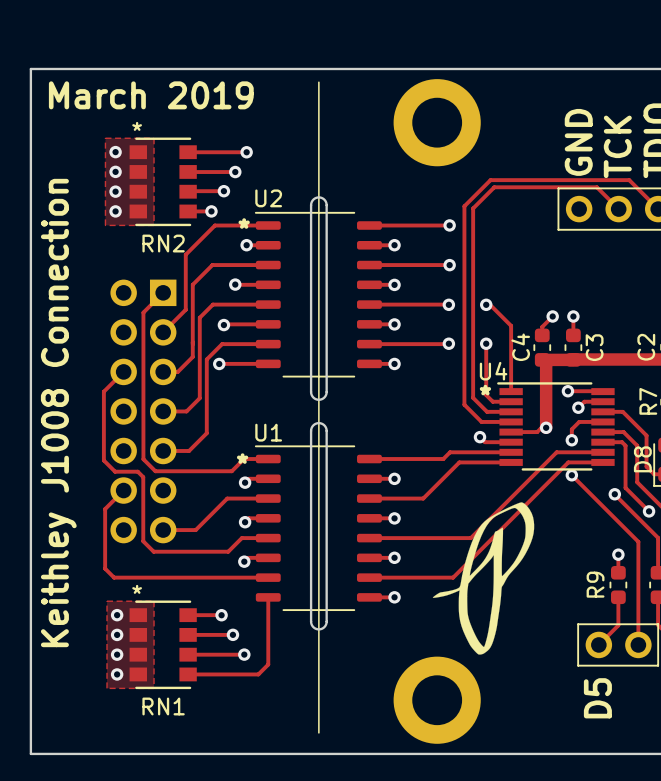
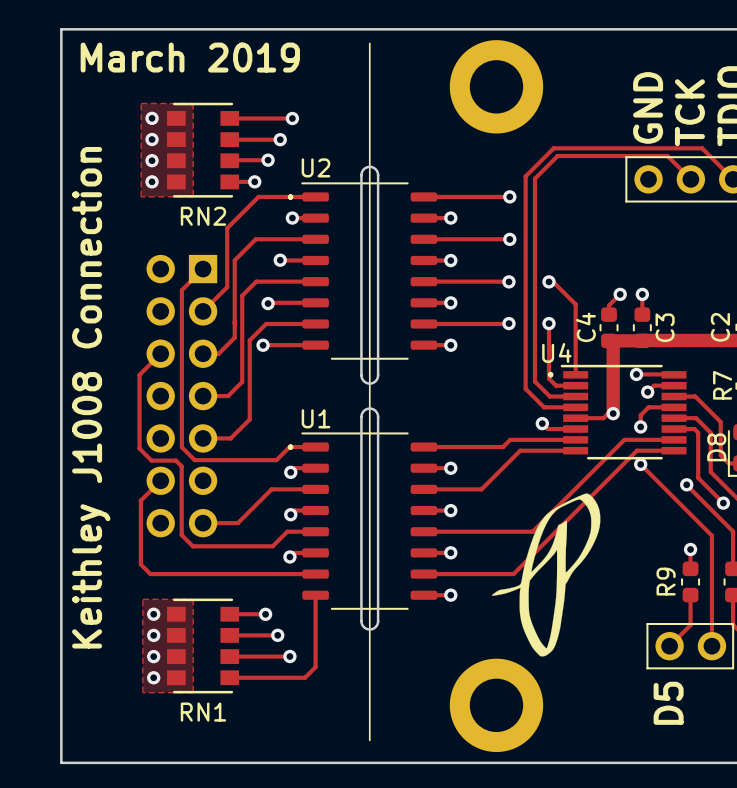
RN2 text: * (137, 126) -> none
text: * (244, 223) -> . (290, 197)
text: * (485, 390) -> . (550, 374)
text: * (242, 458) -> . (290, 447)
RN1 text: * (137, 589) -> none

